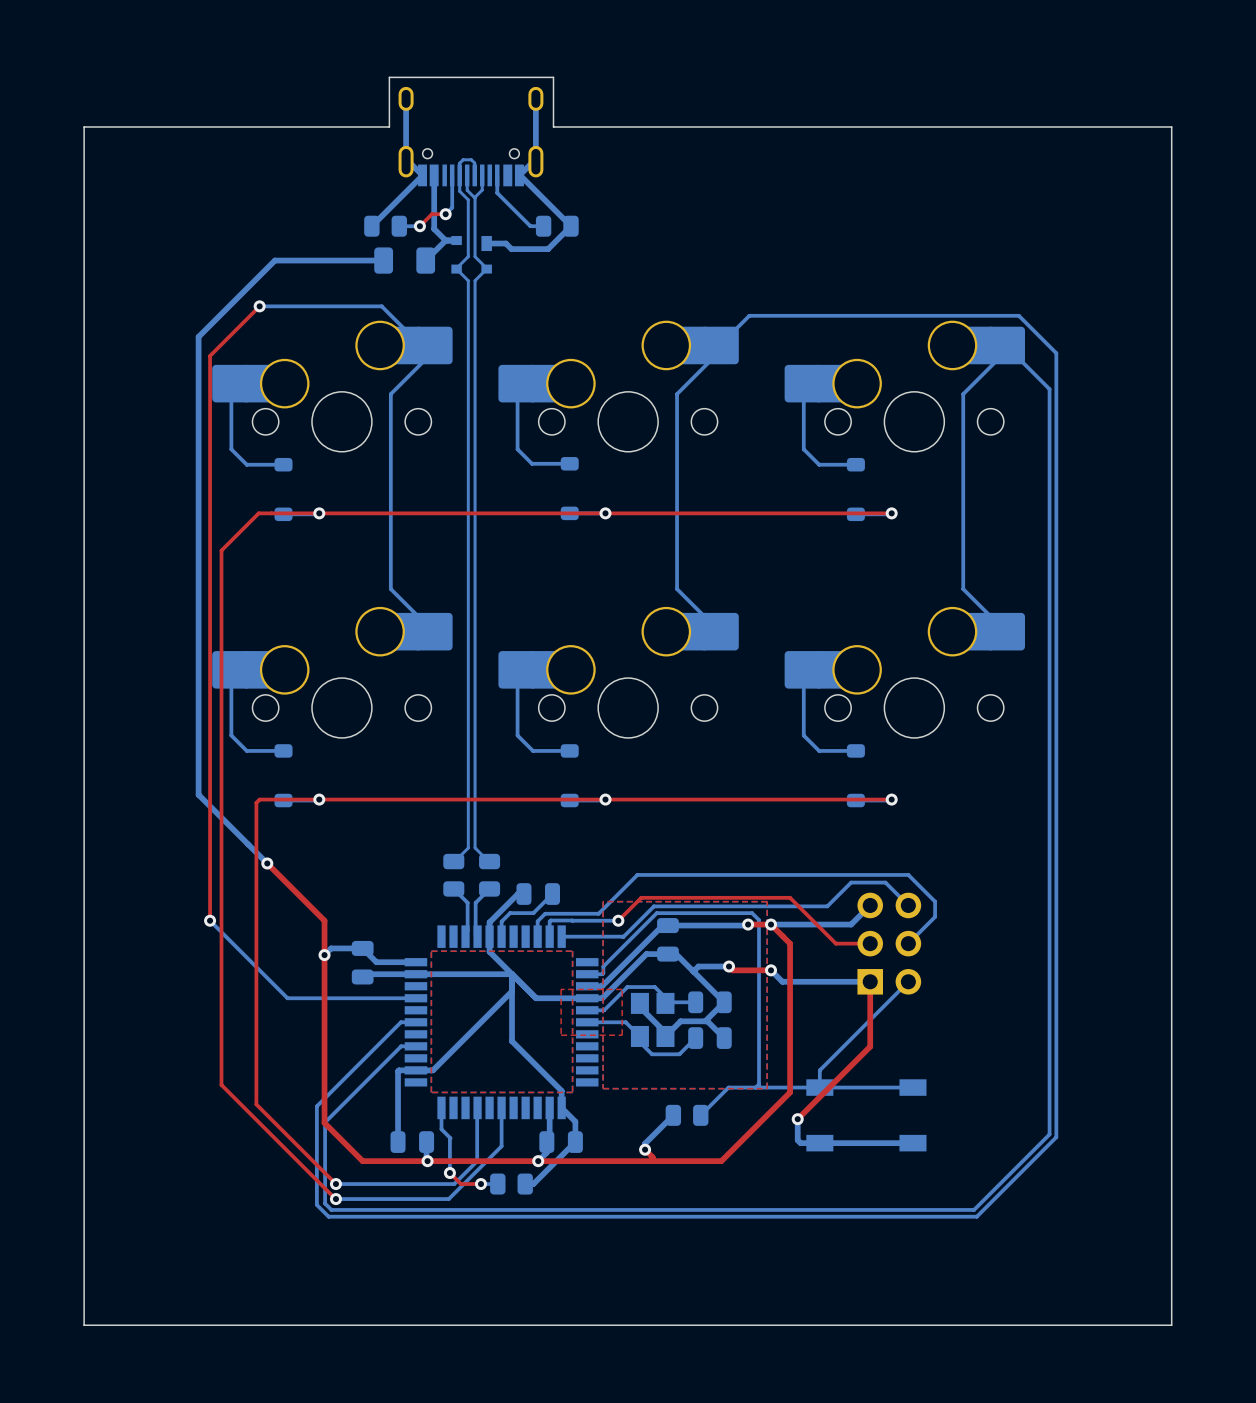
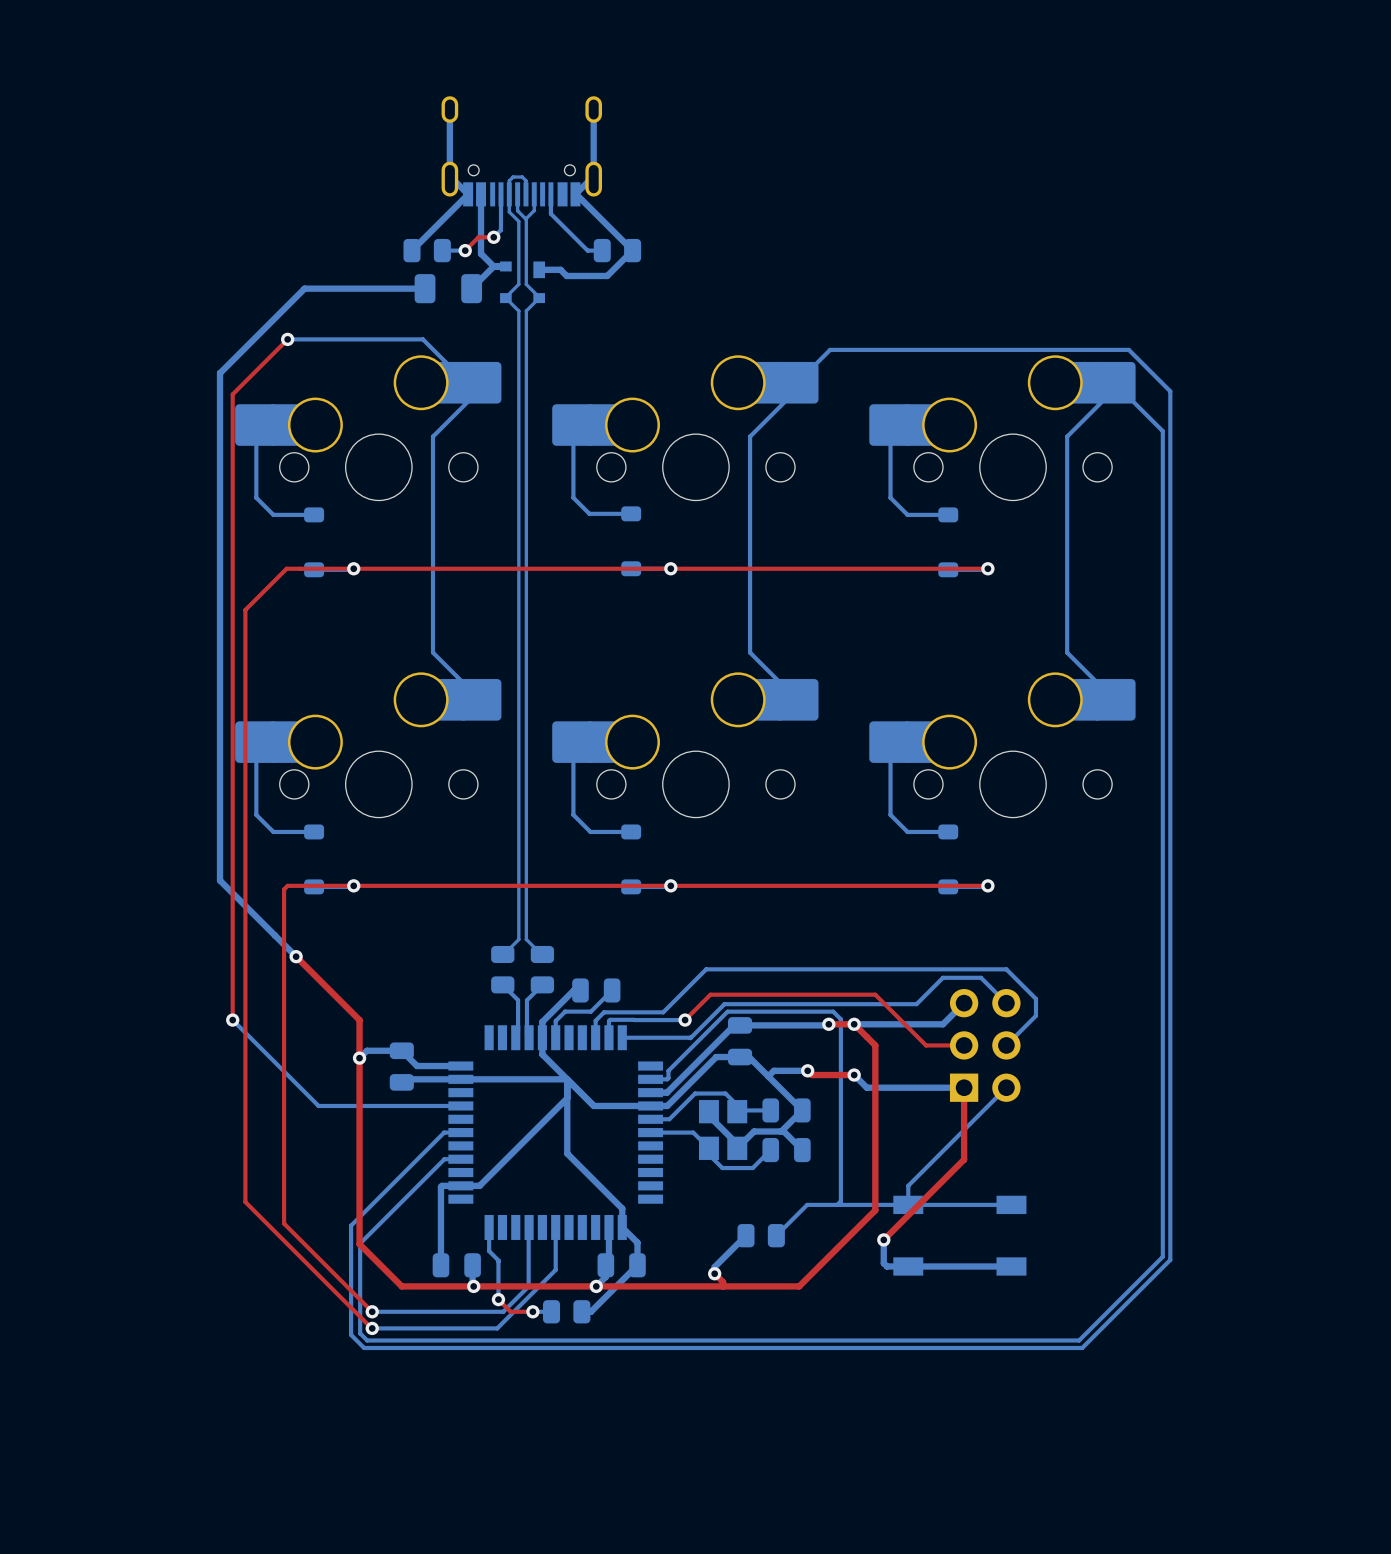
board edge: (389, 77) (553, 77) (553, 126) (1171, 126) (1171, 1325) (84, 1325) (84, 126) (389, 126) (389, 77) -> none
top zone outline: (603, 901) (603, 1088) (767, 1088) (767, 901) (603, 901) -> none
top zone outline: (431, 951) (431, 1092) (572, 1092) (572, 951) (431, 951) -> none
top zone outline: (561, 989) (622, 989) (622, 1035) (561, 1035) (561, 989) -> none

